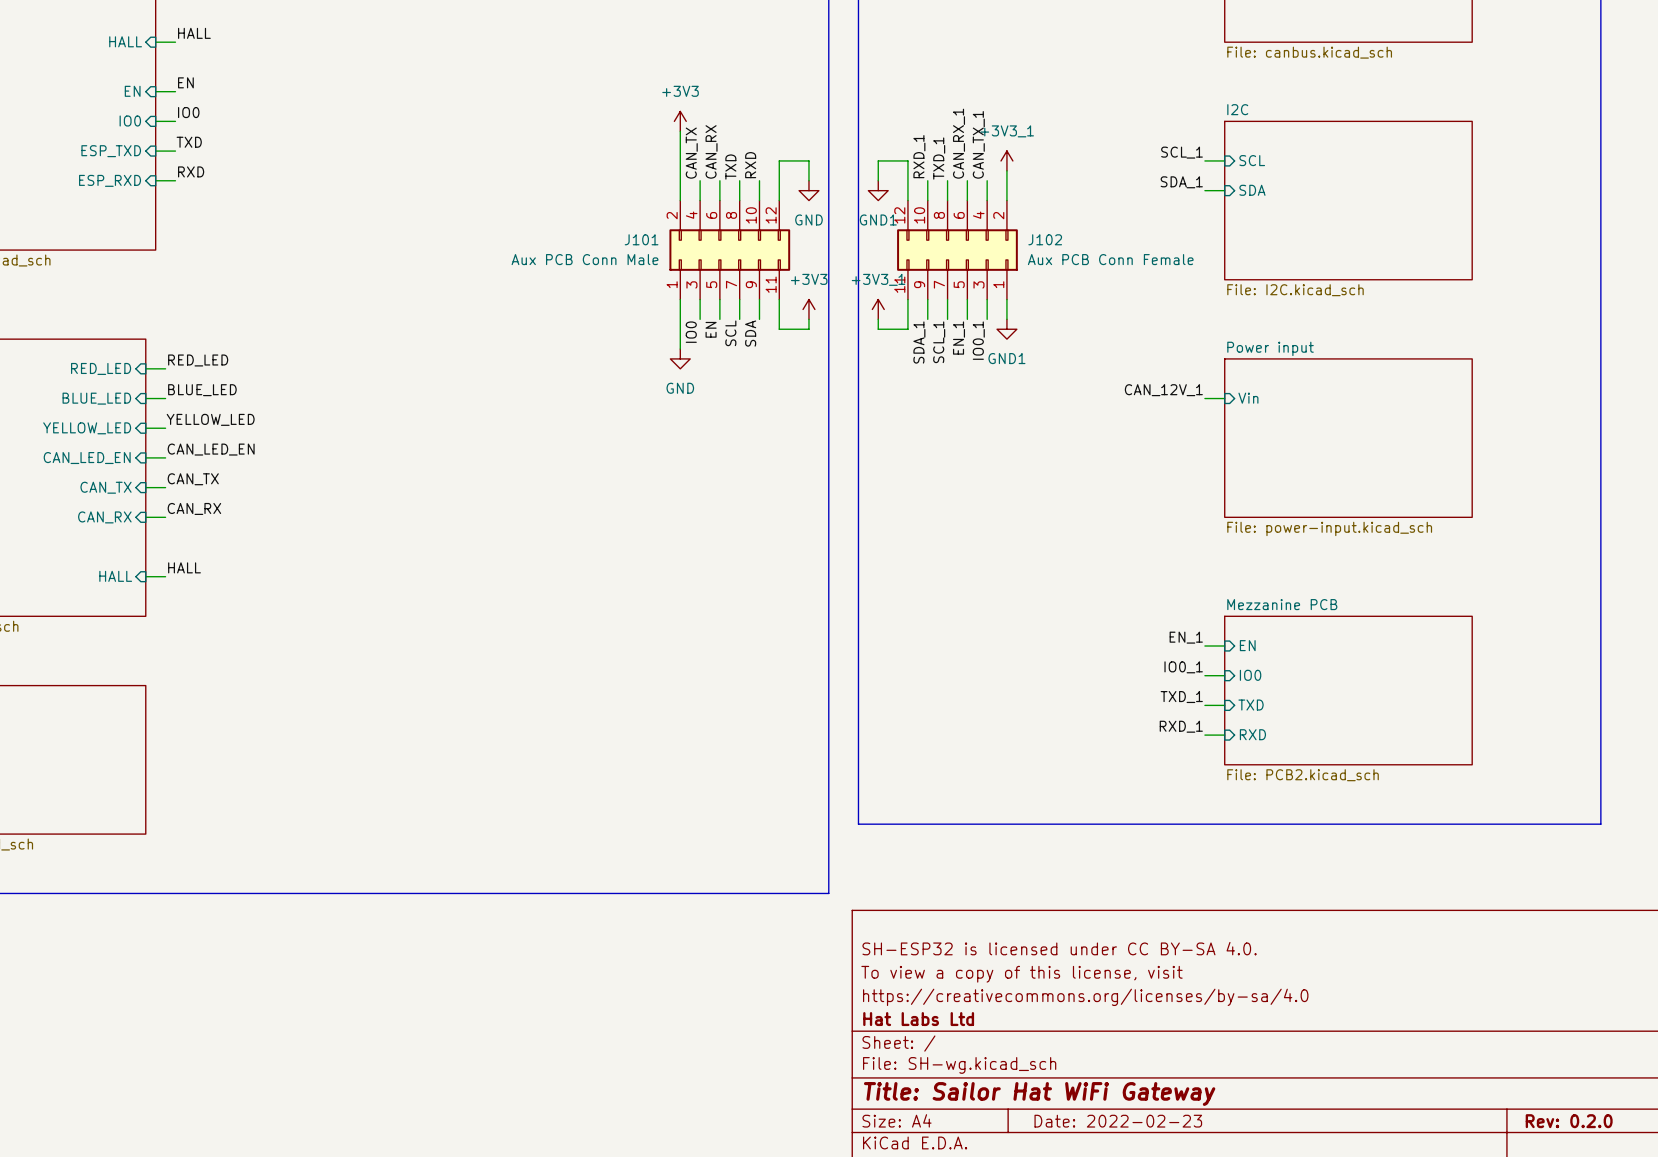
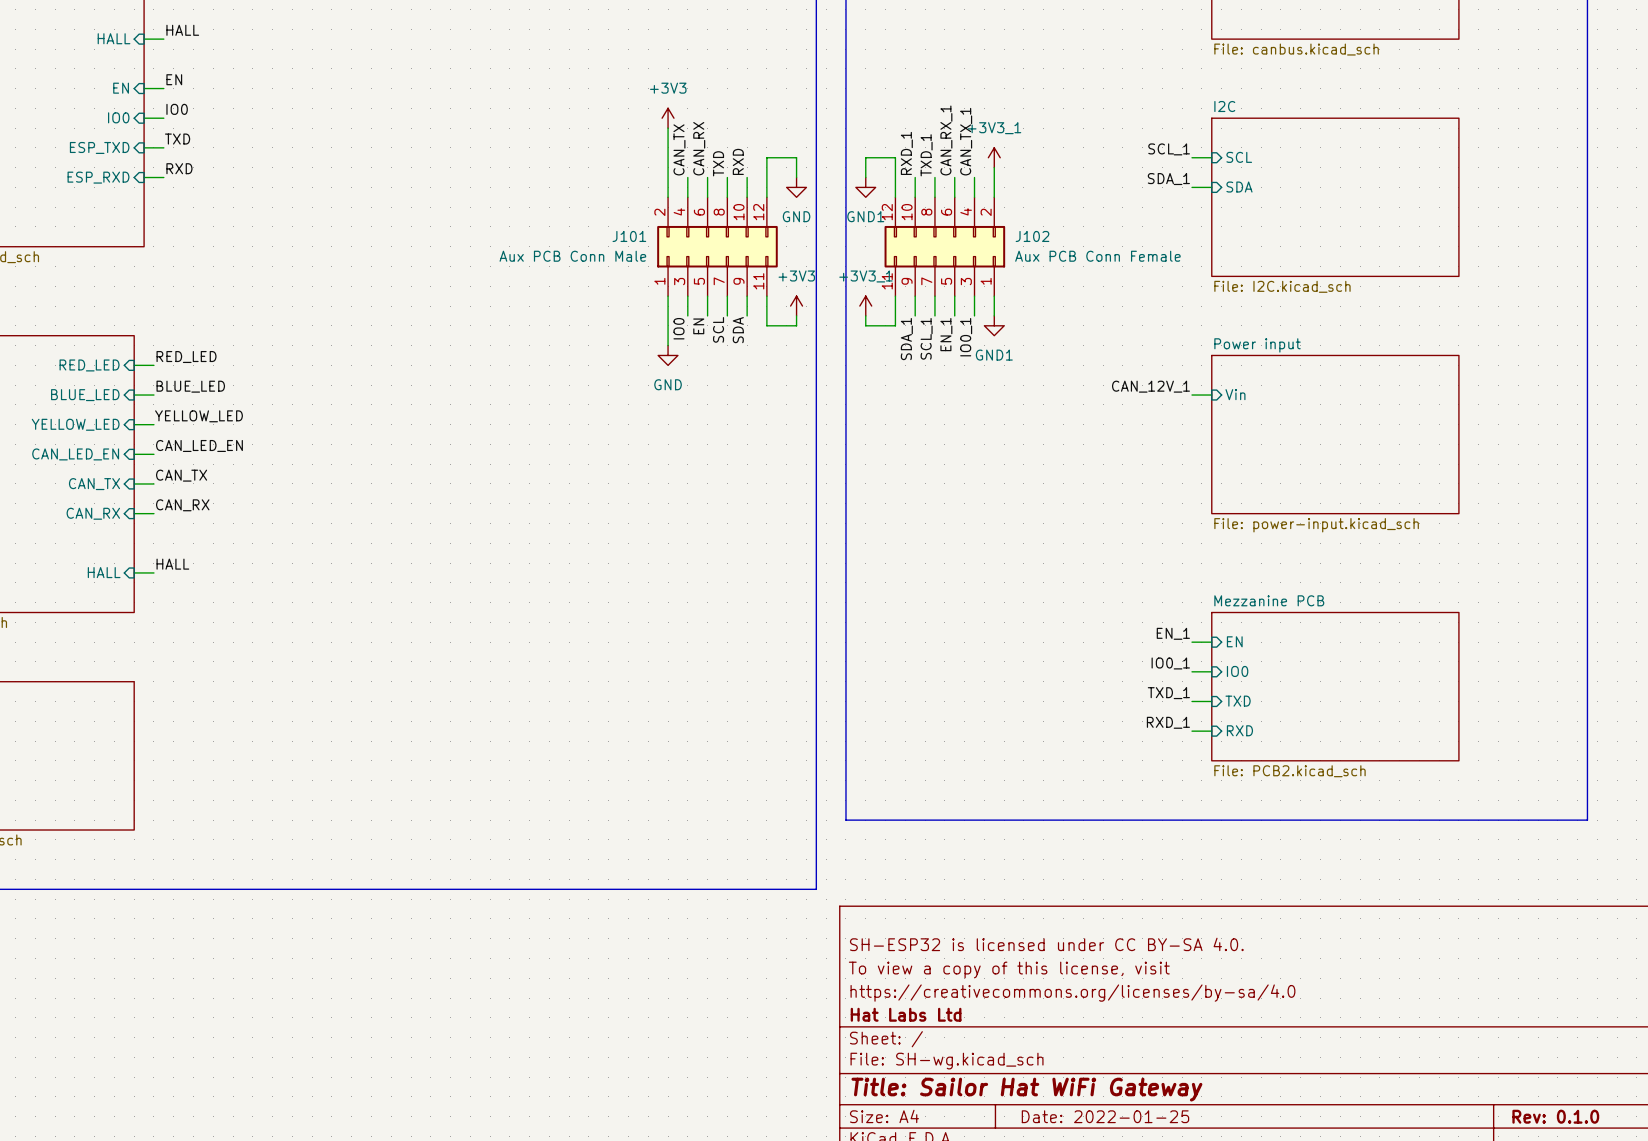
title block: Date: 2022-02-23 (1118, 1121) -> Date: 2022-01-25 (1105, 1116)
title block: Rev: 0.2.0 (1569, 1121) -> Rev: 0.1.0 (1555, 1116)

